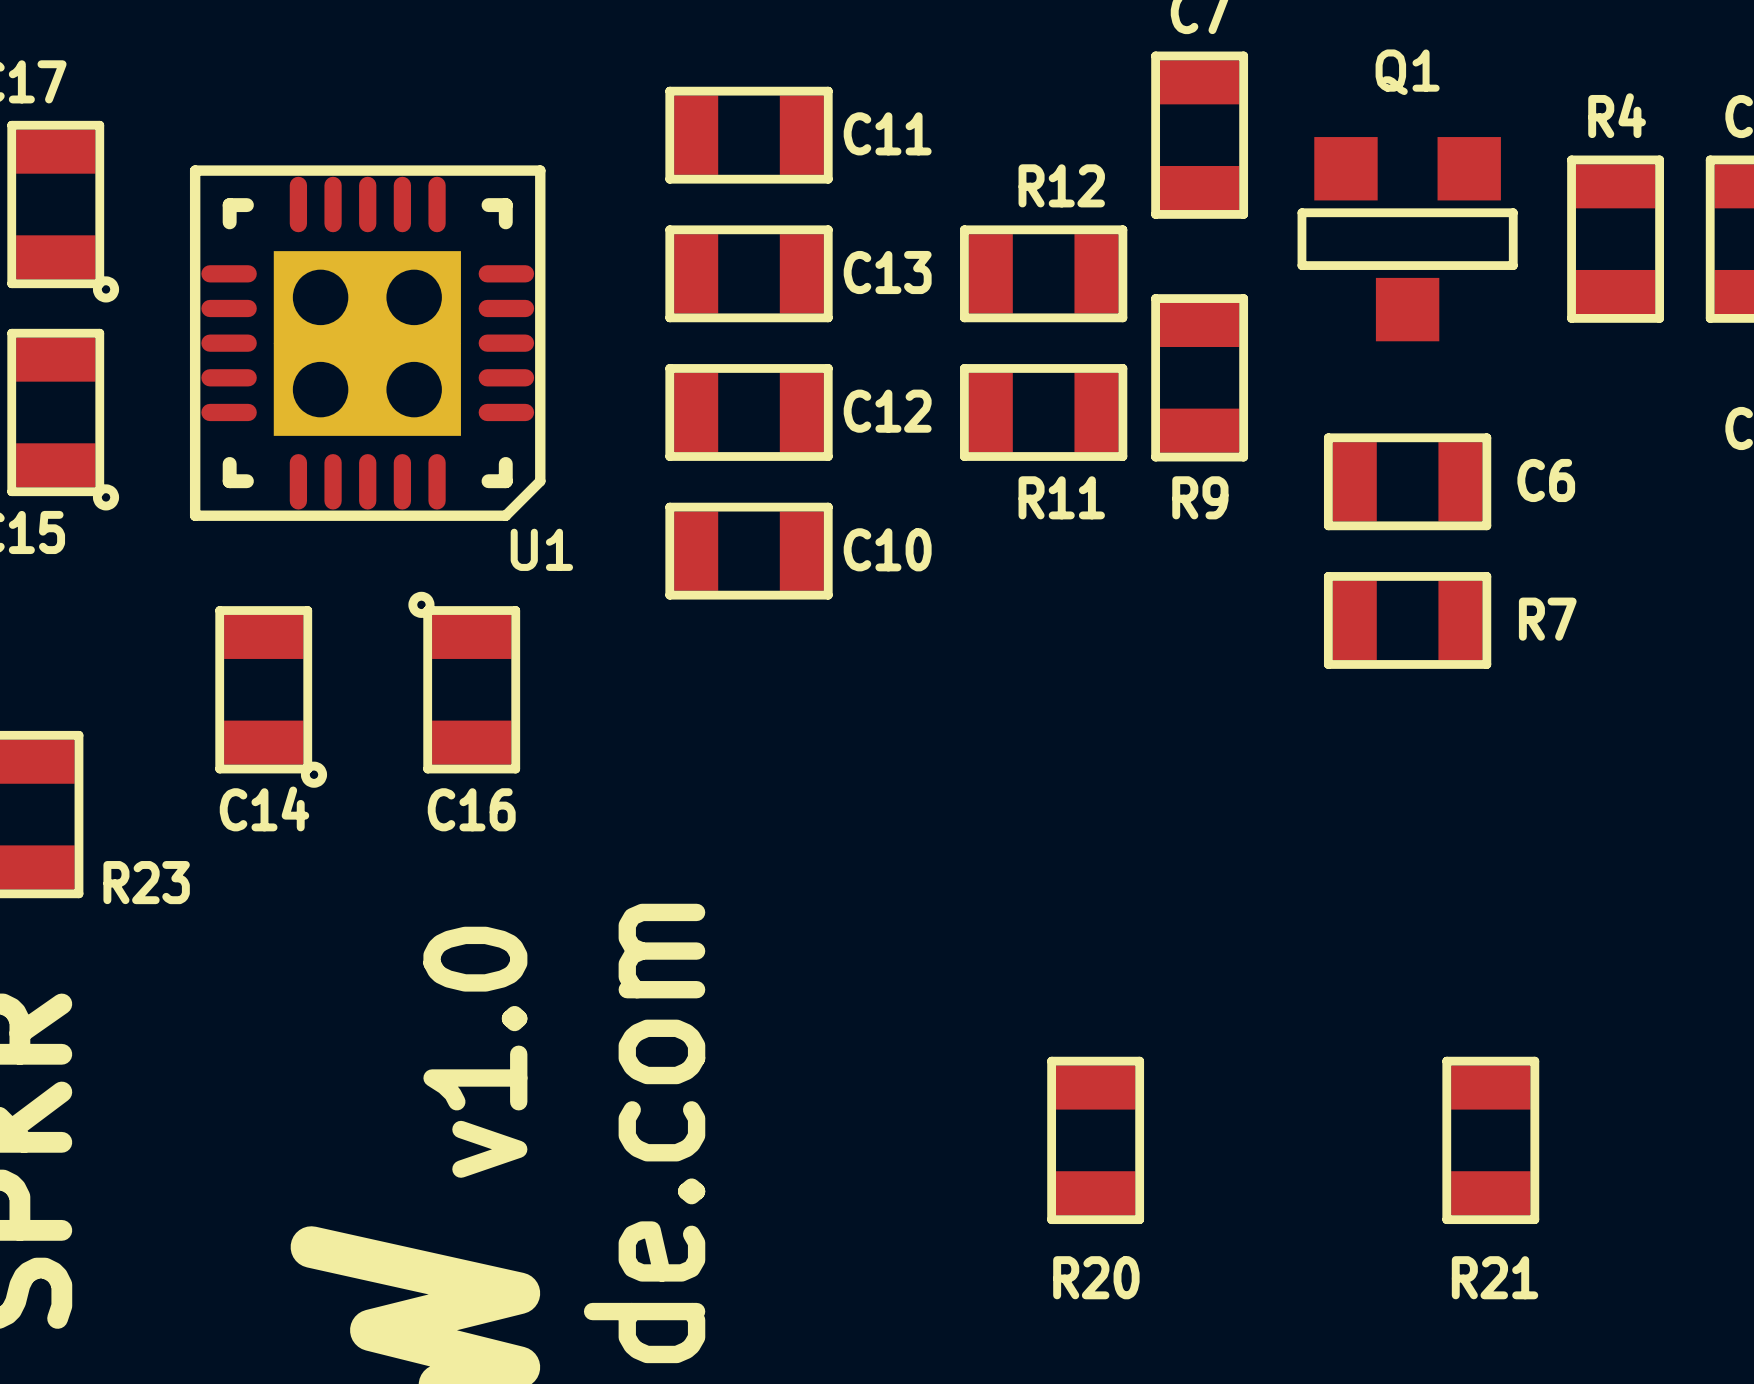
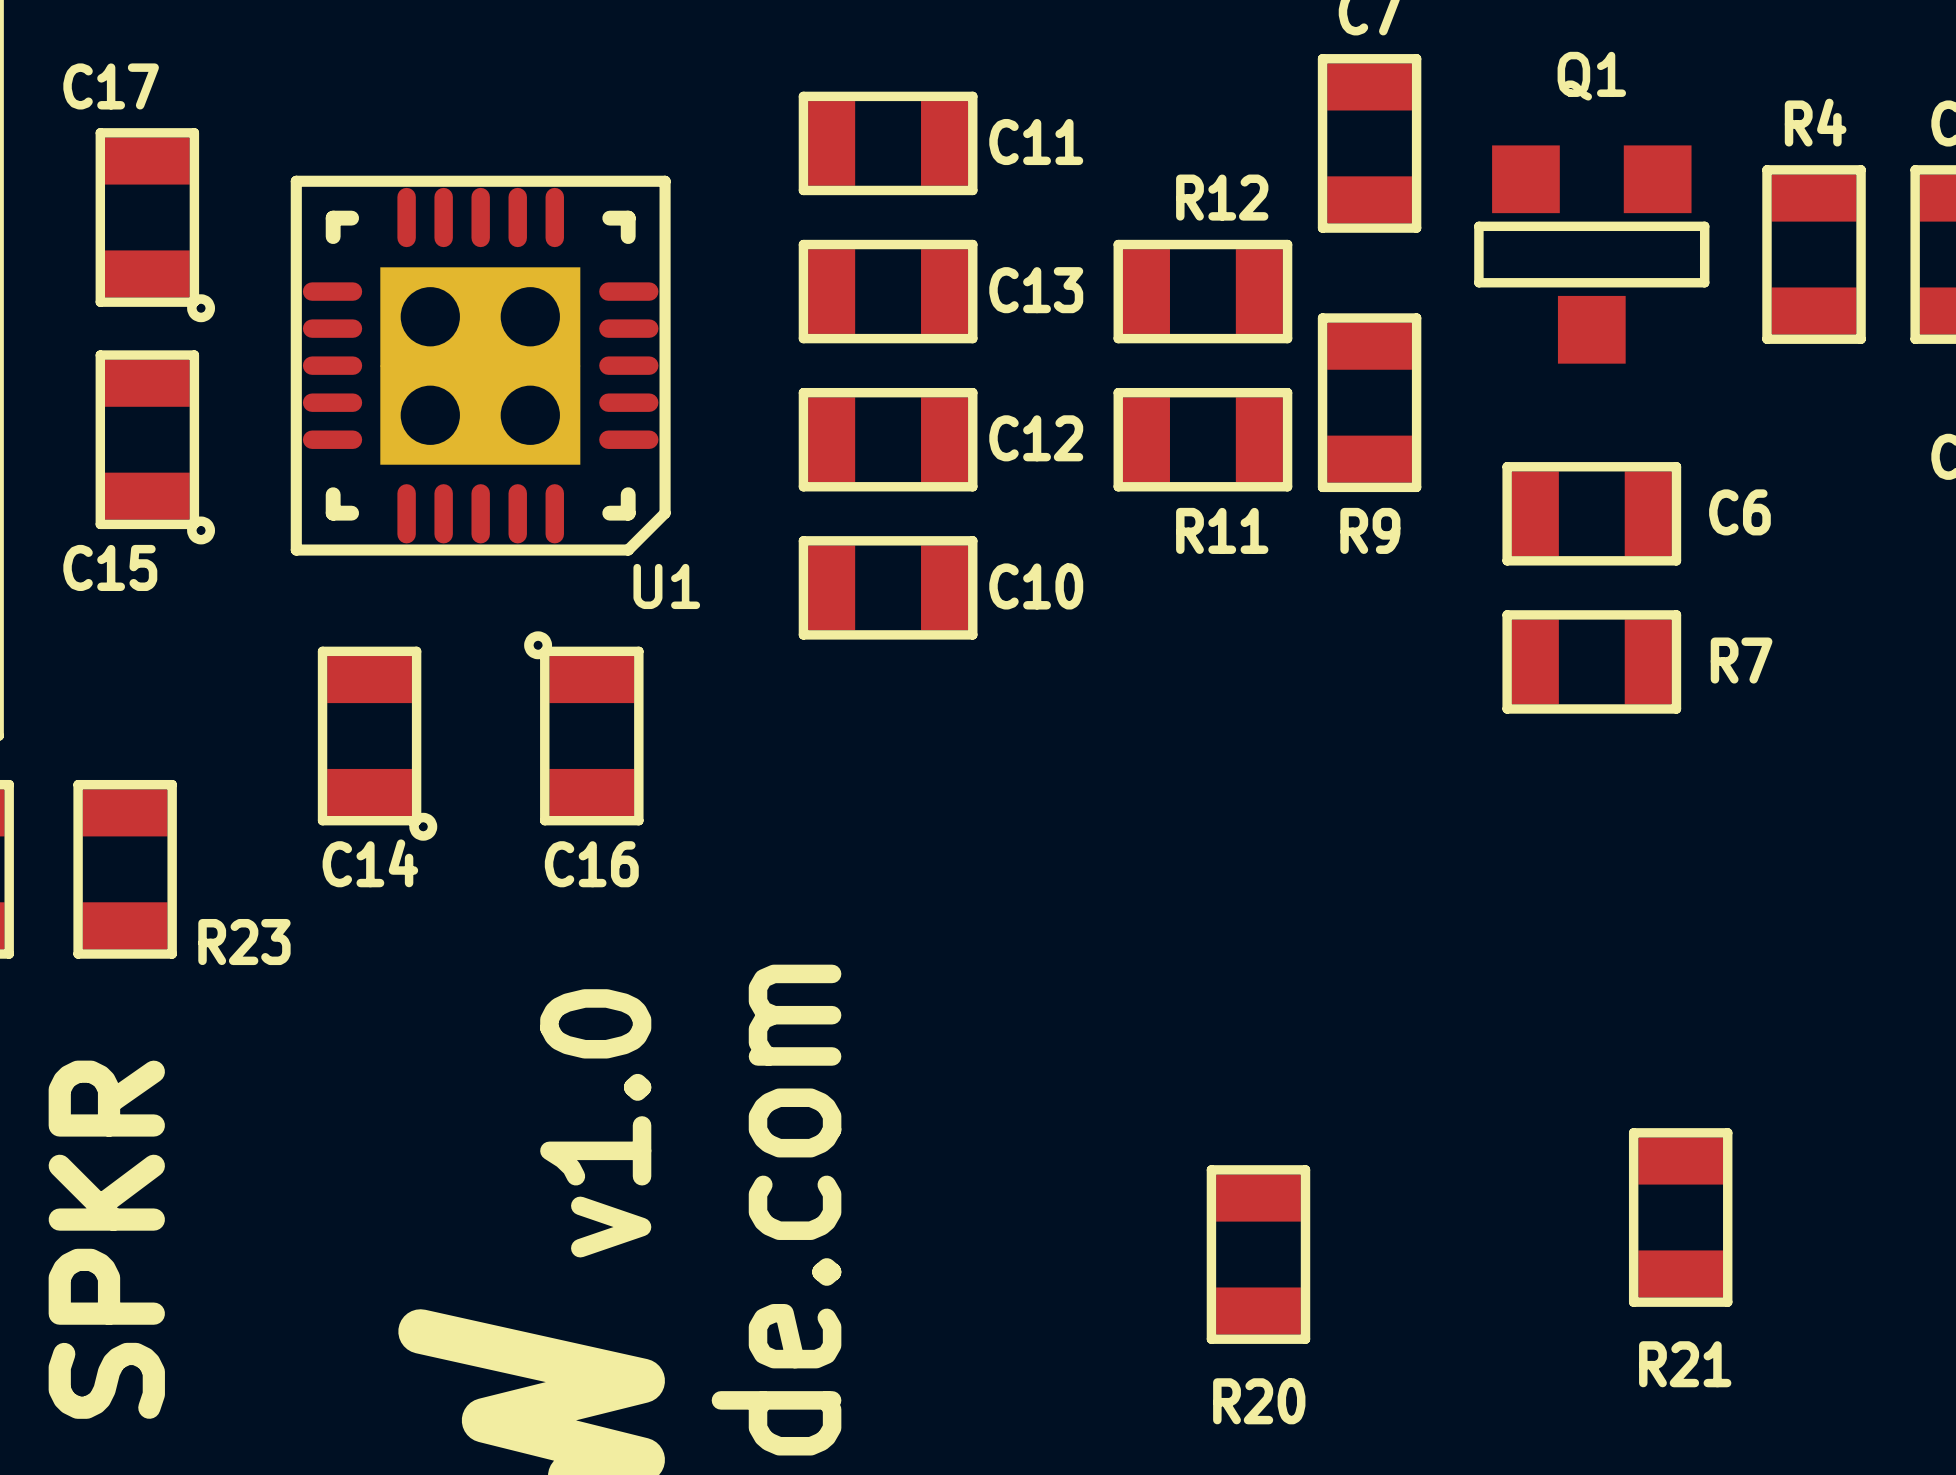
R20 position: (1095, 1140) -> (1258, 1254)

